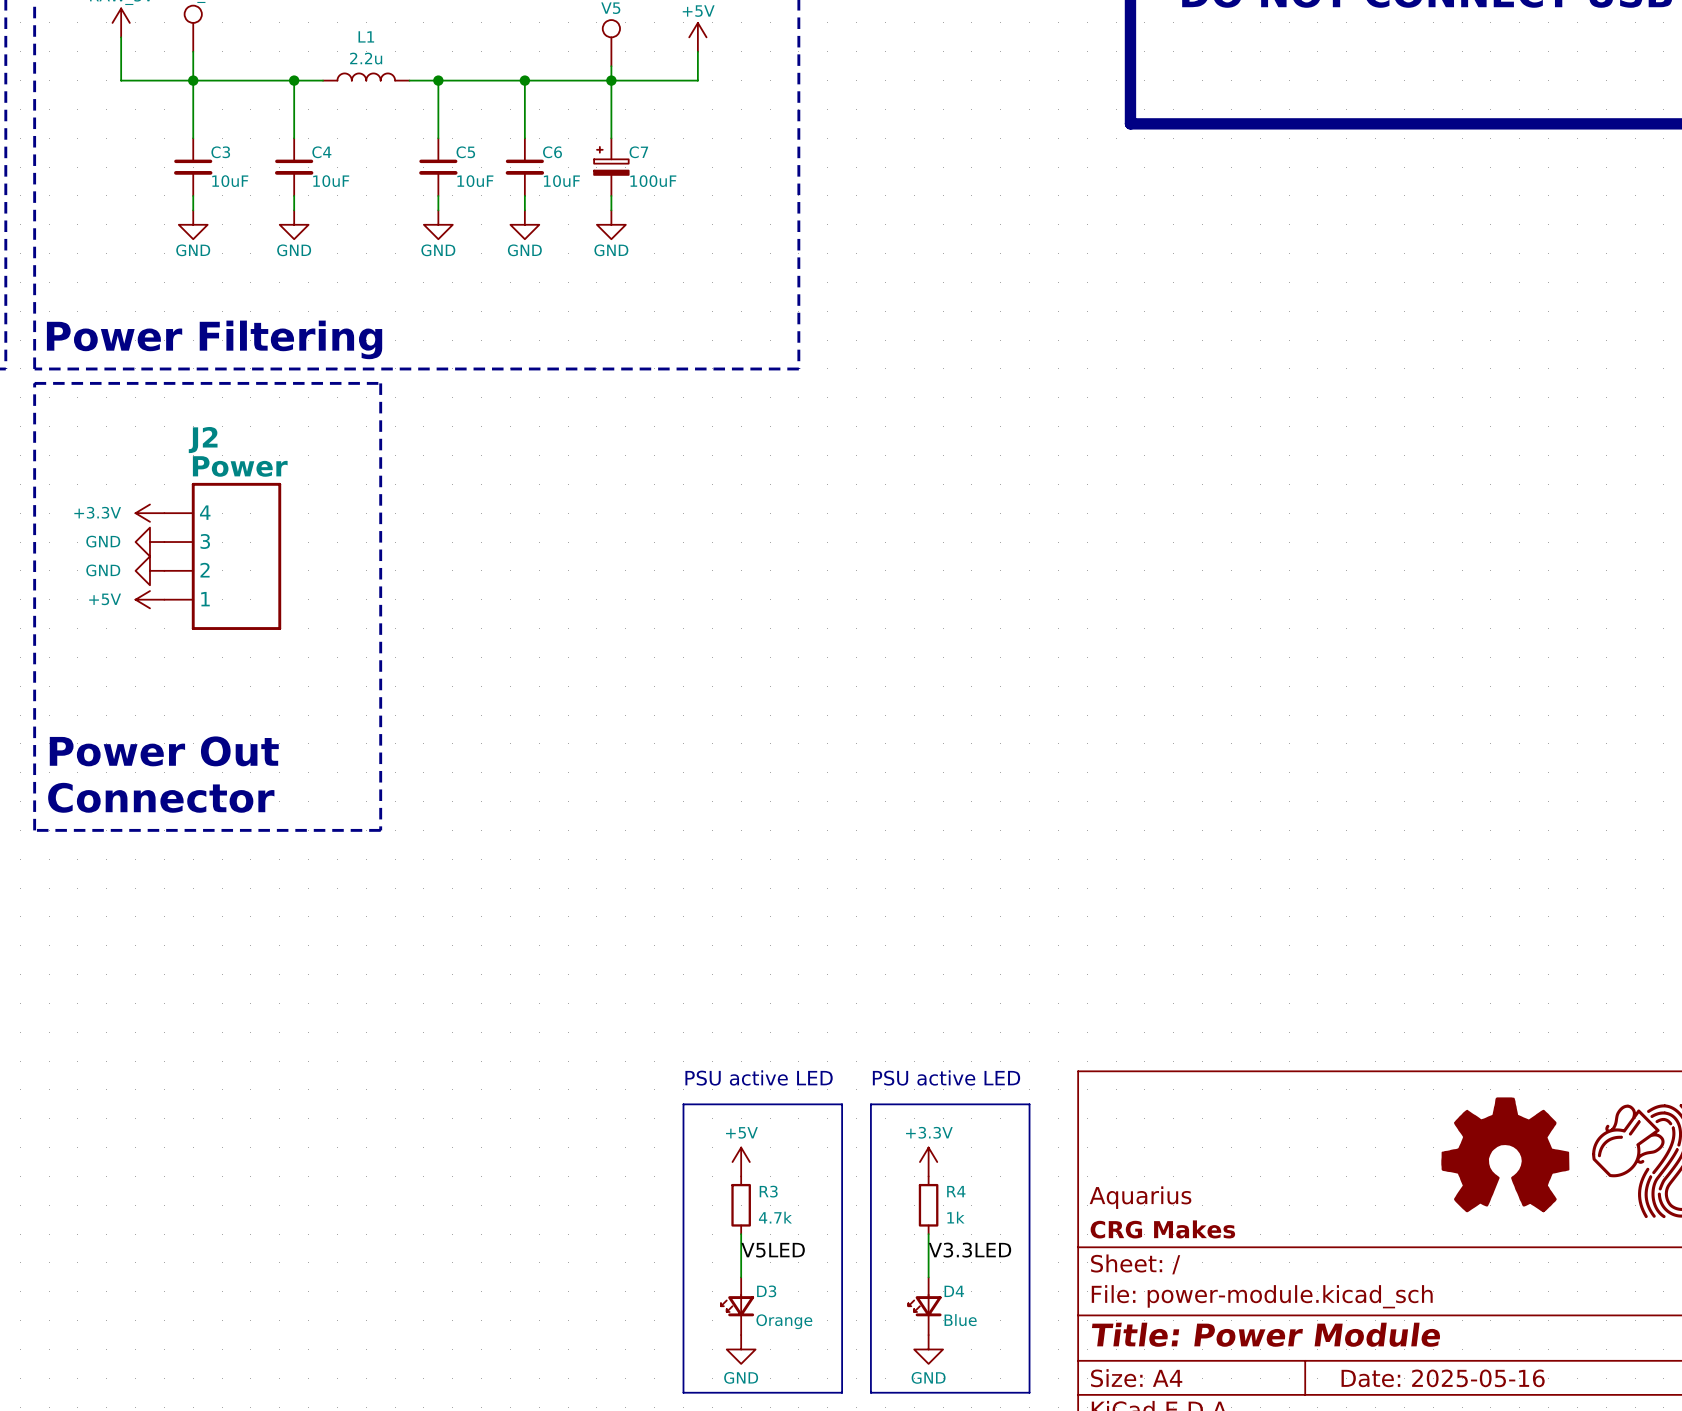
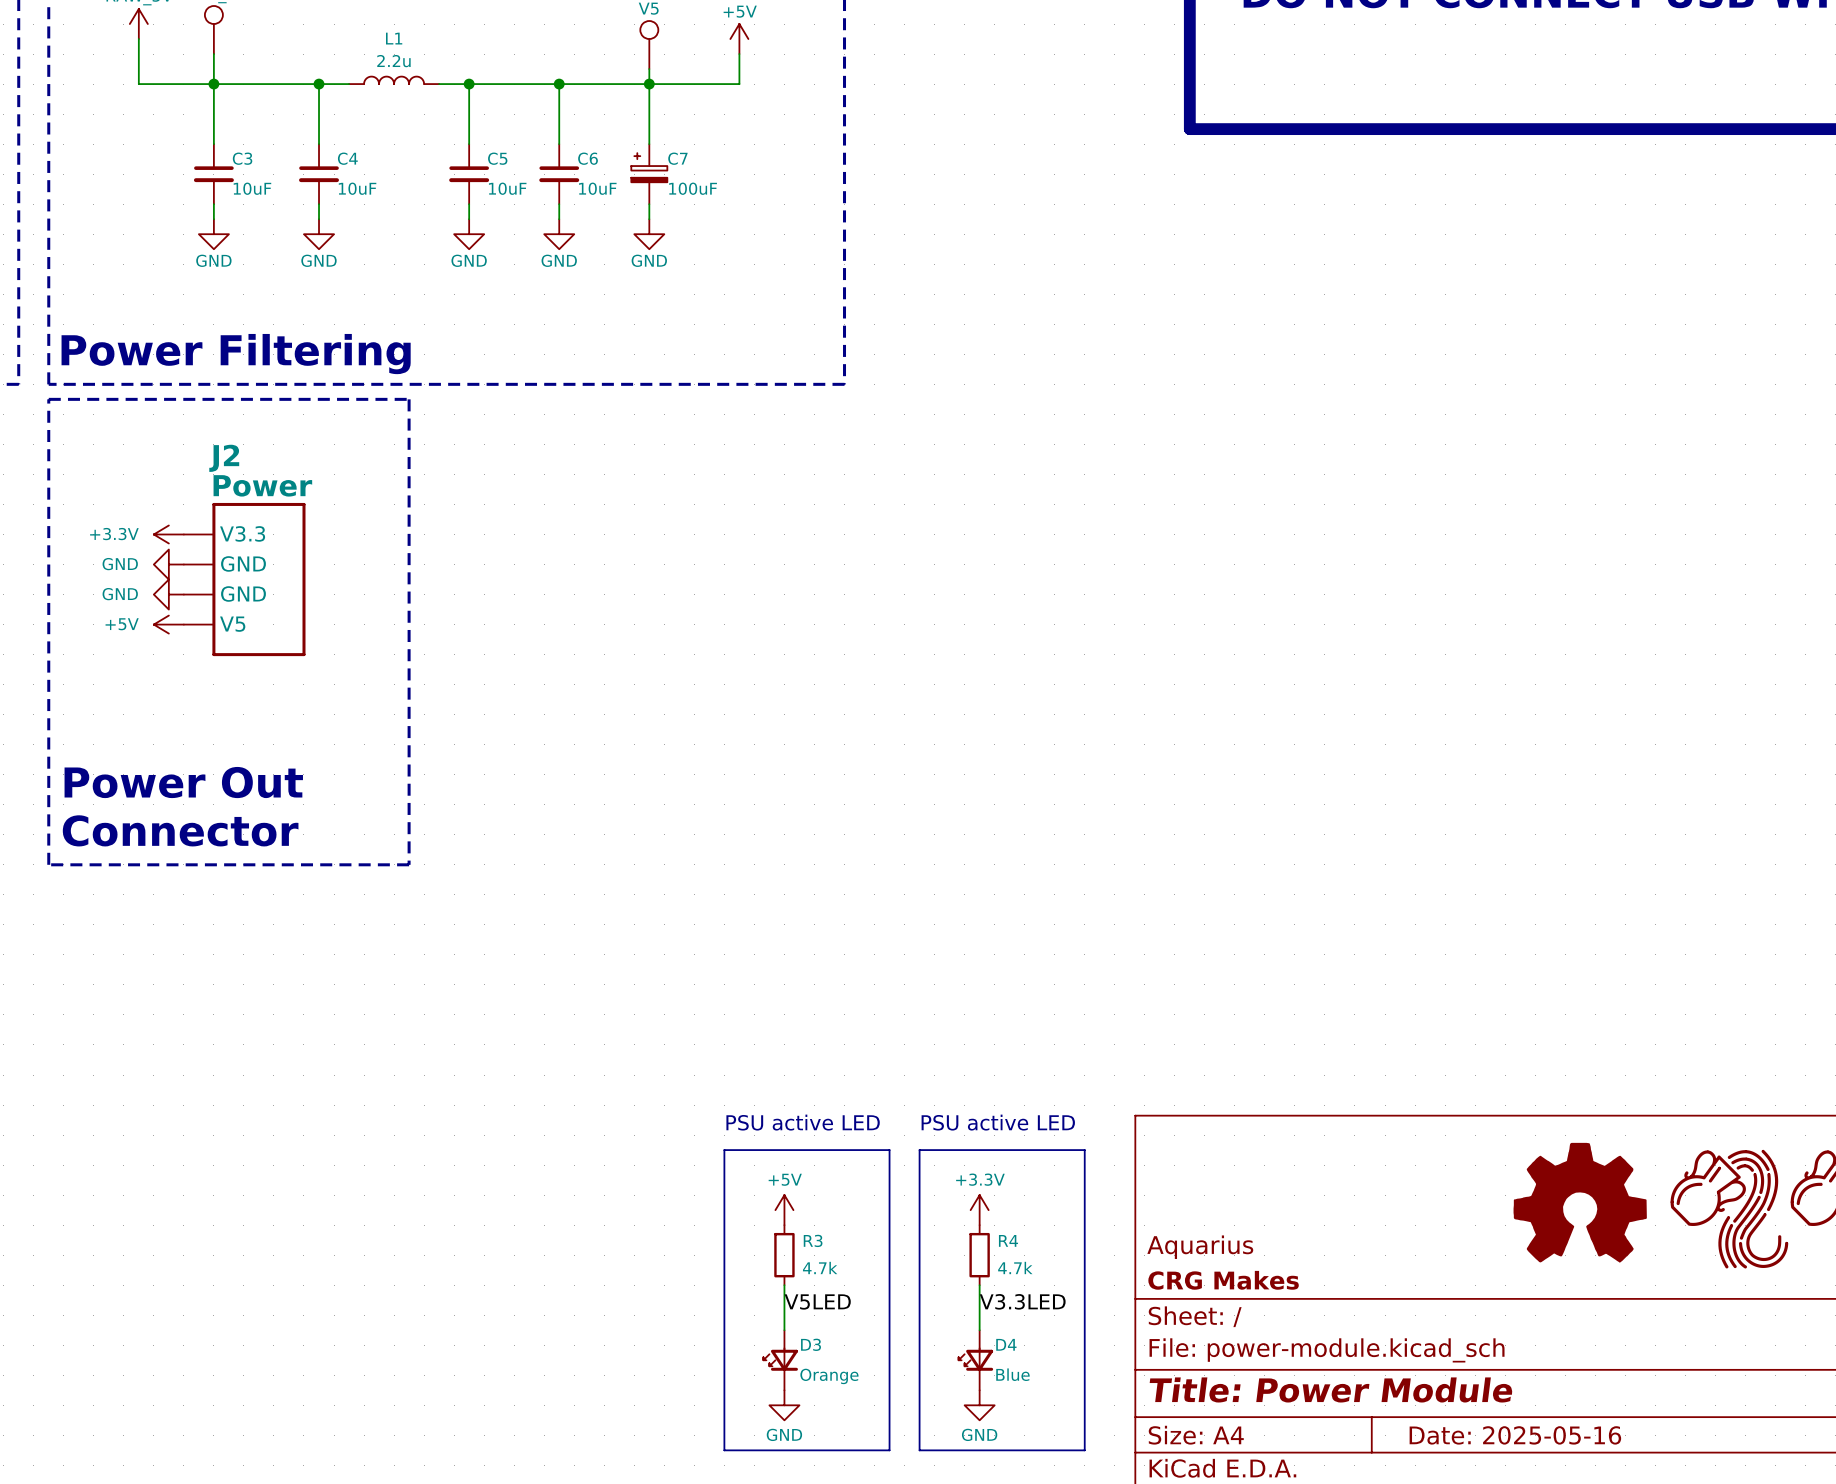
J2 pin name: 4 (205, 512) -> V3.3 (242, 533)
J2 pin name: 3 (205, 541) -> GND (243, 563)
J2 pin name: 2 (205, 570) -> GND (243, 593)
J2 pin name: 1 (205, 599) -> V5 (232, 624)
R4 value: 1k (955, 1217) -> 4.7k (1015, 1267)

